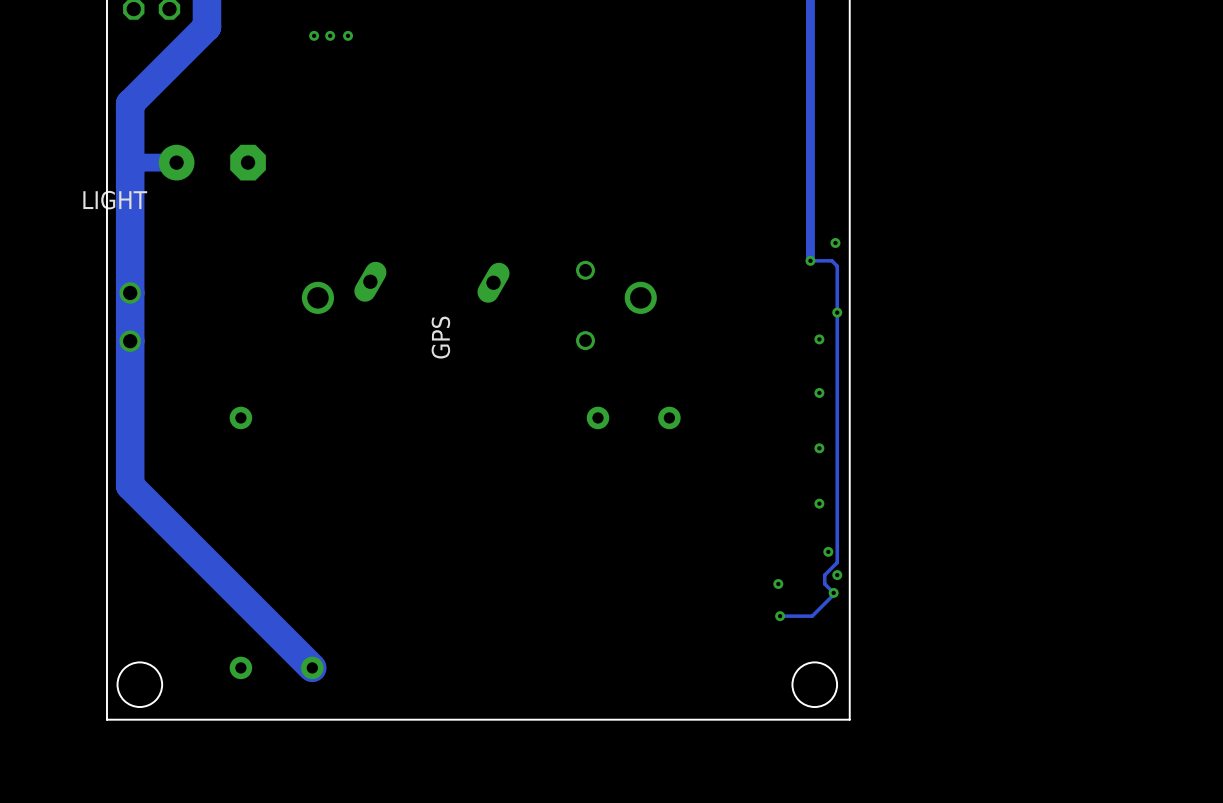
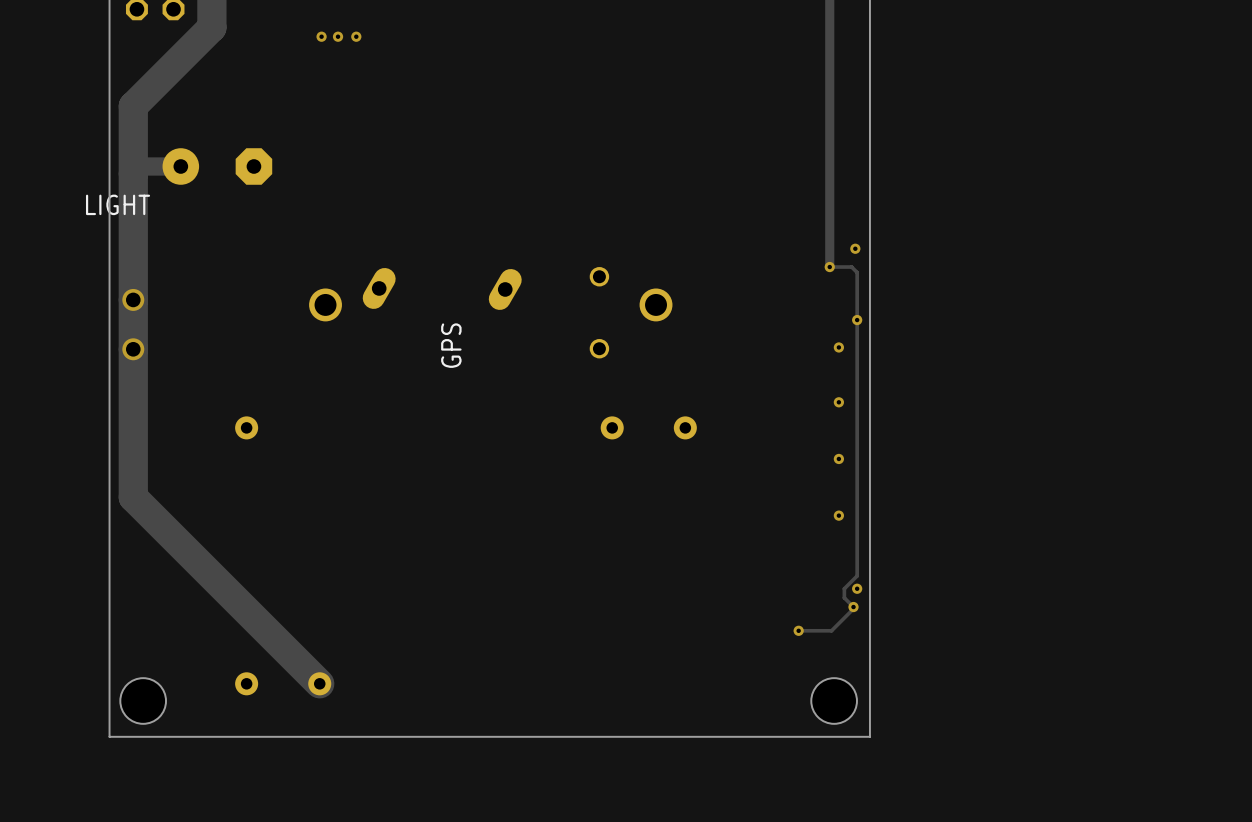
via: (828, 551) -> none
via: (778, 584) -> none

